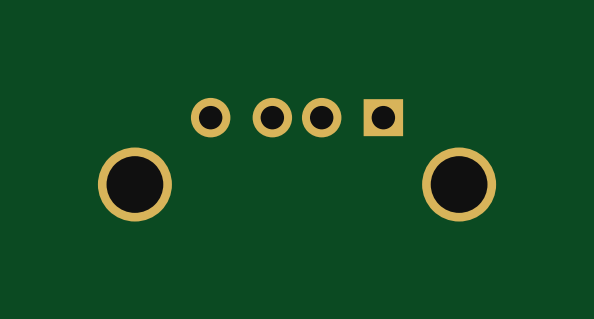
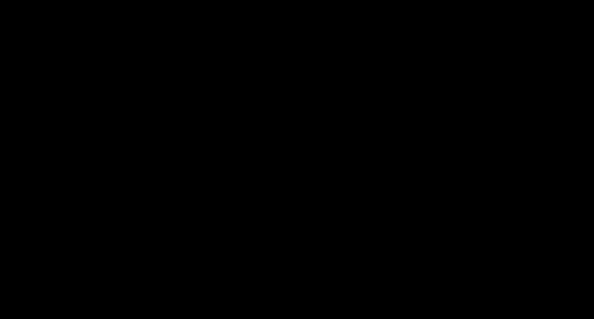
part: (297, 159) -> none

